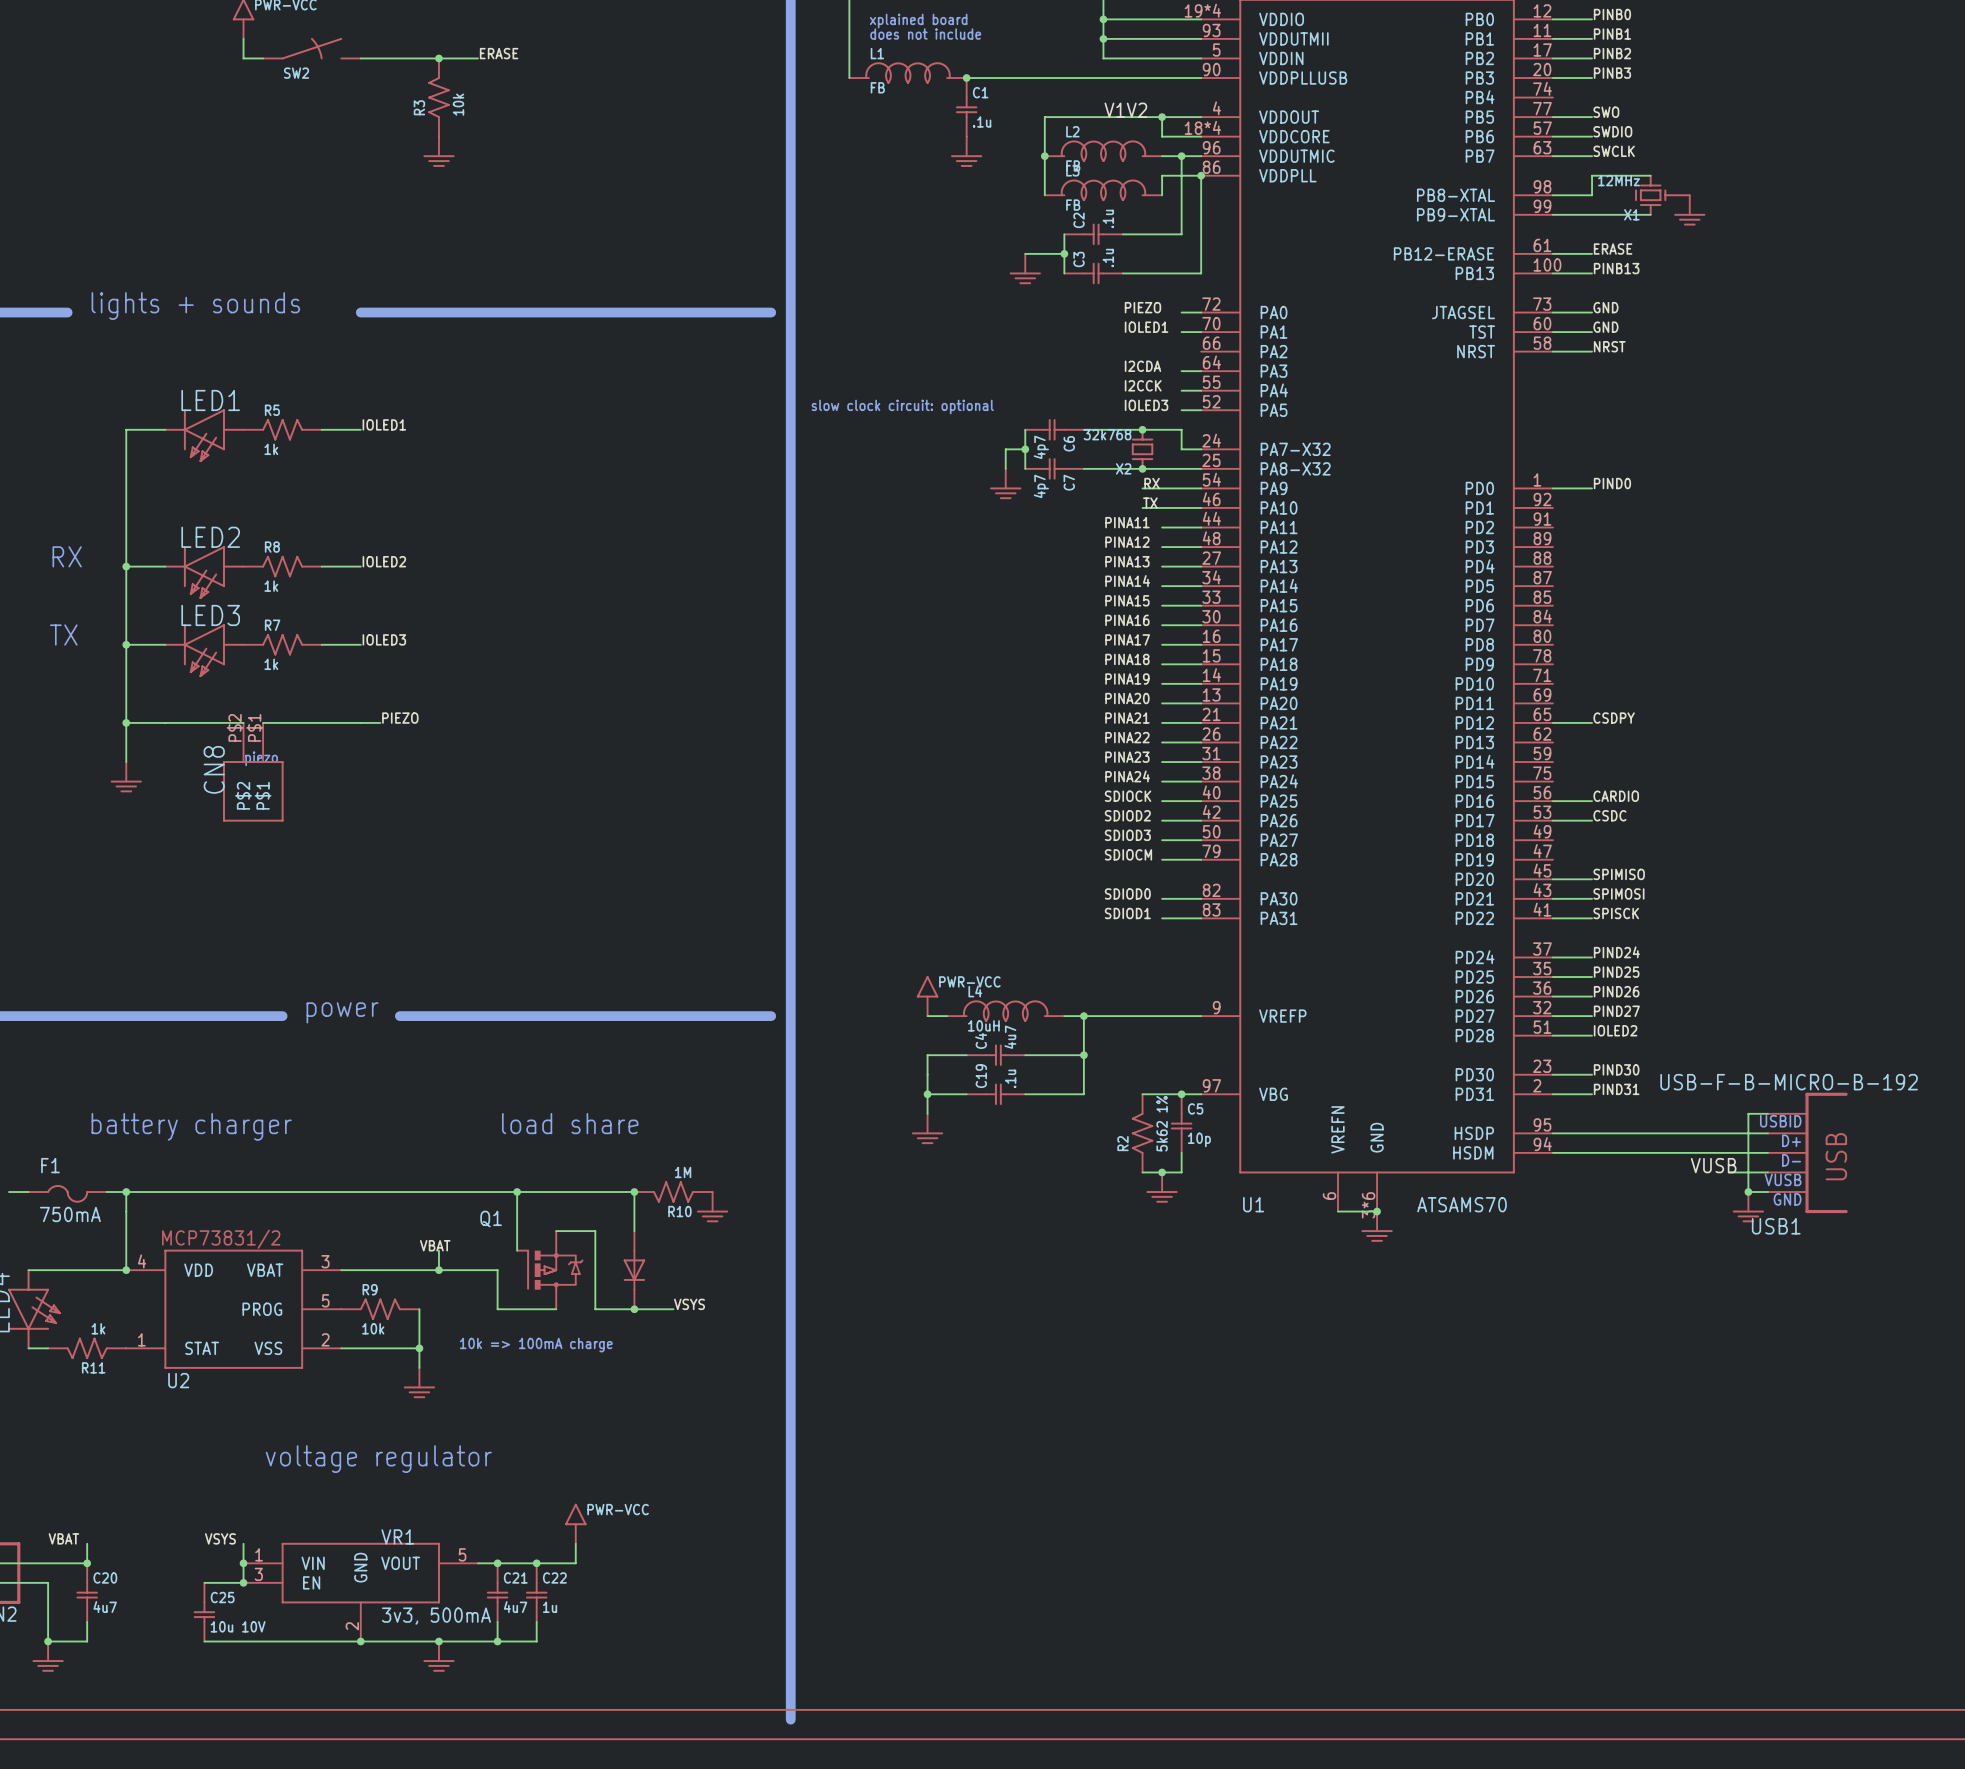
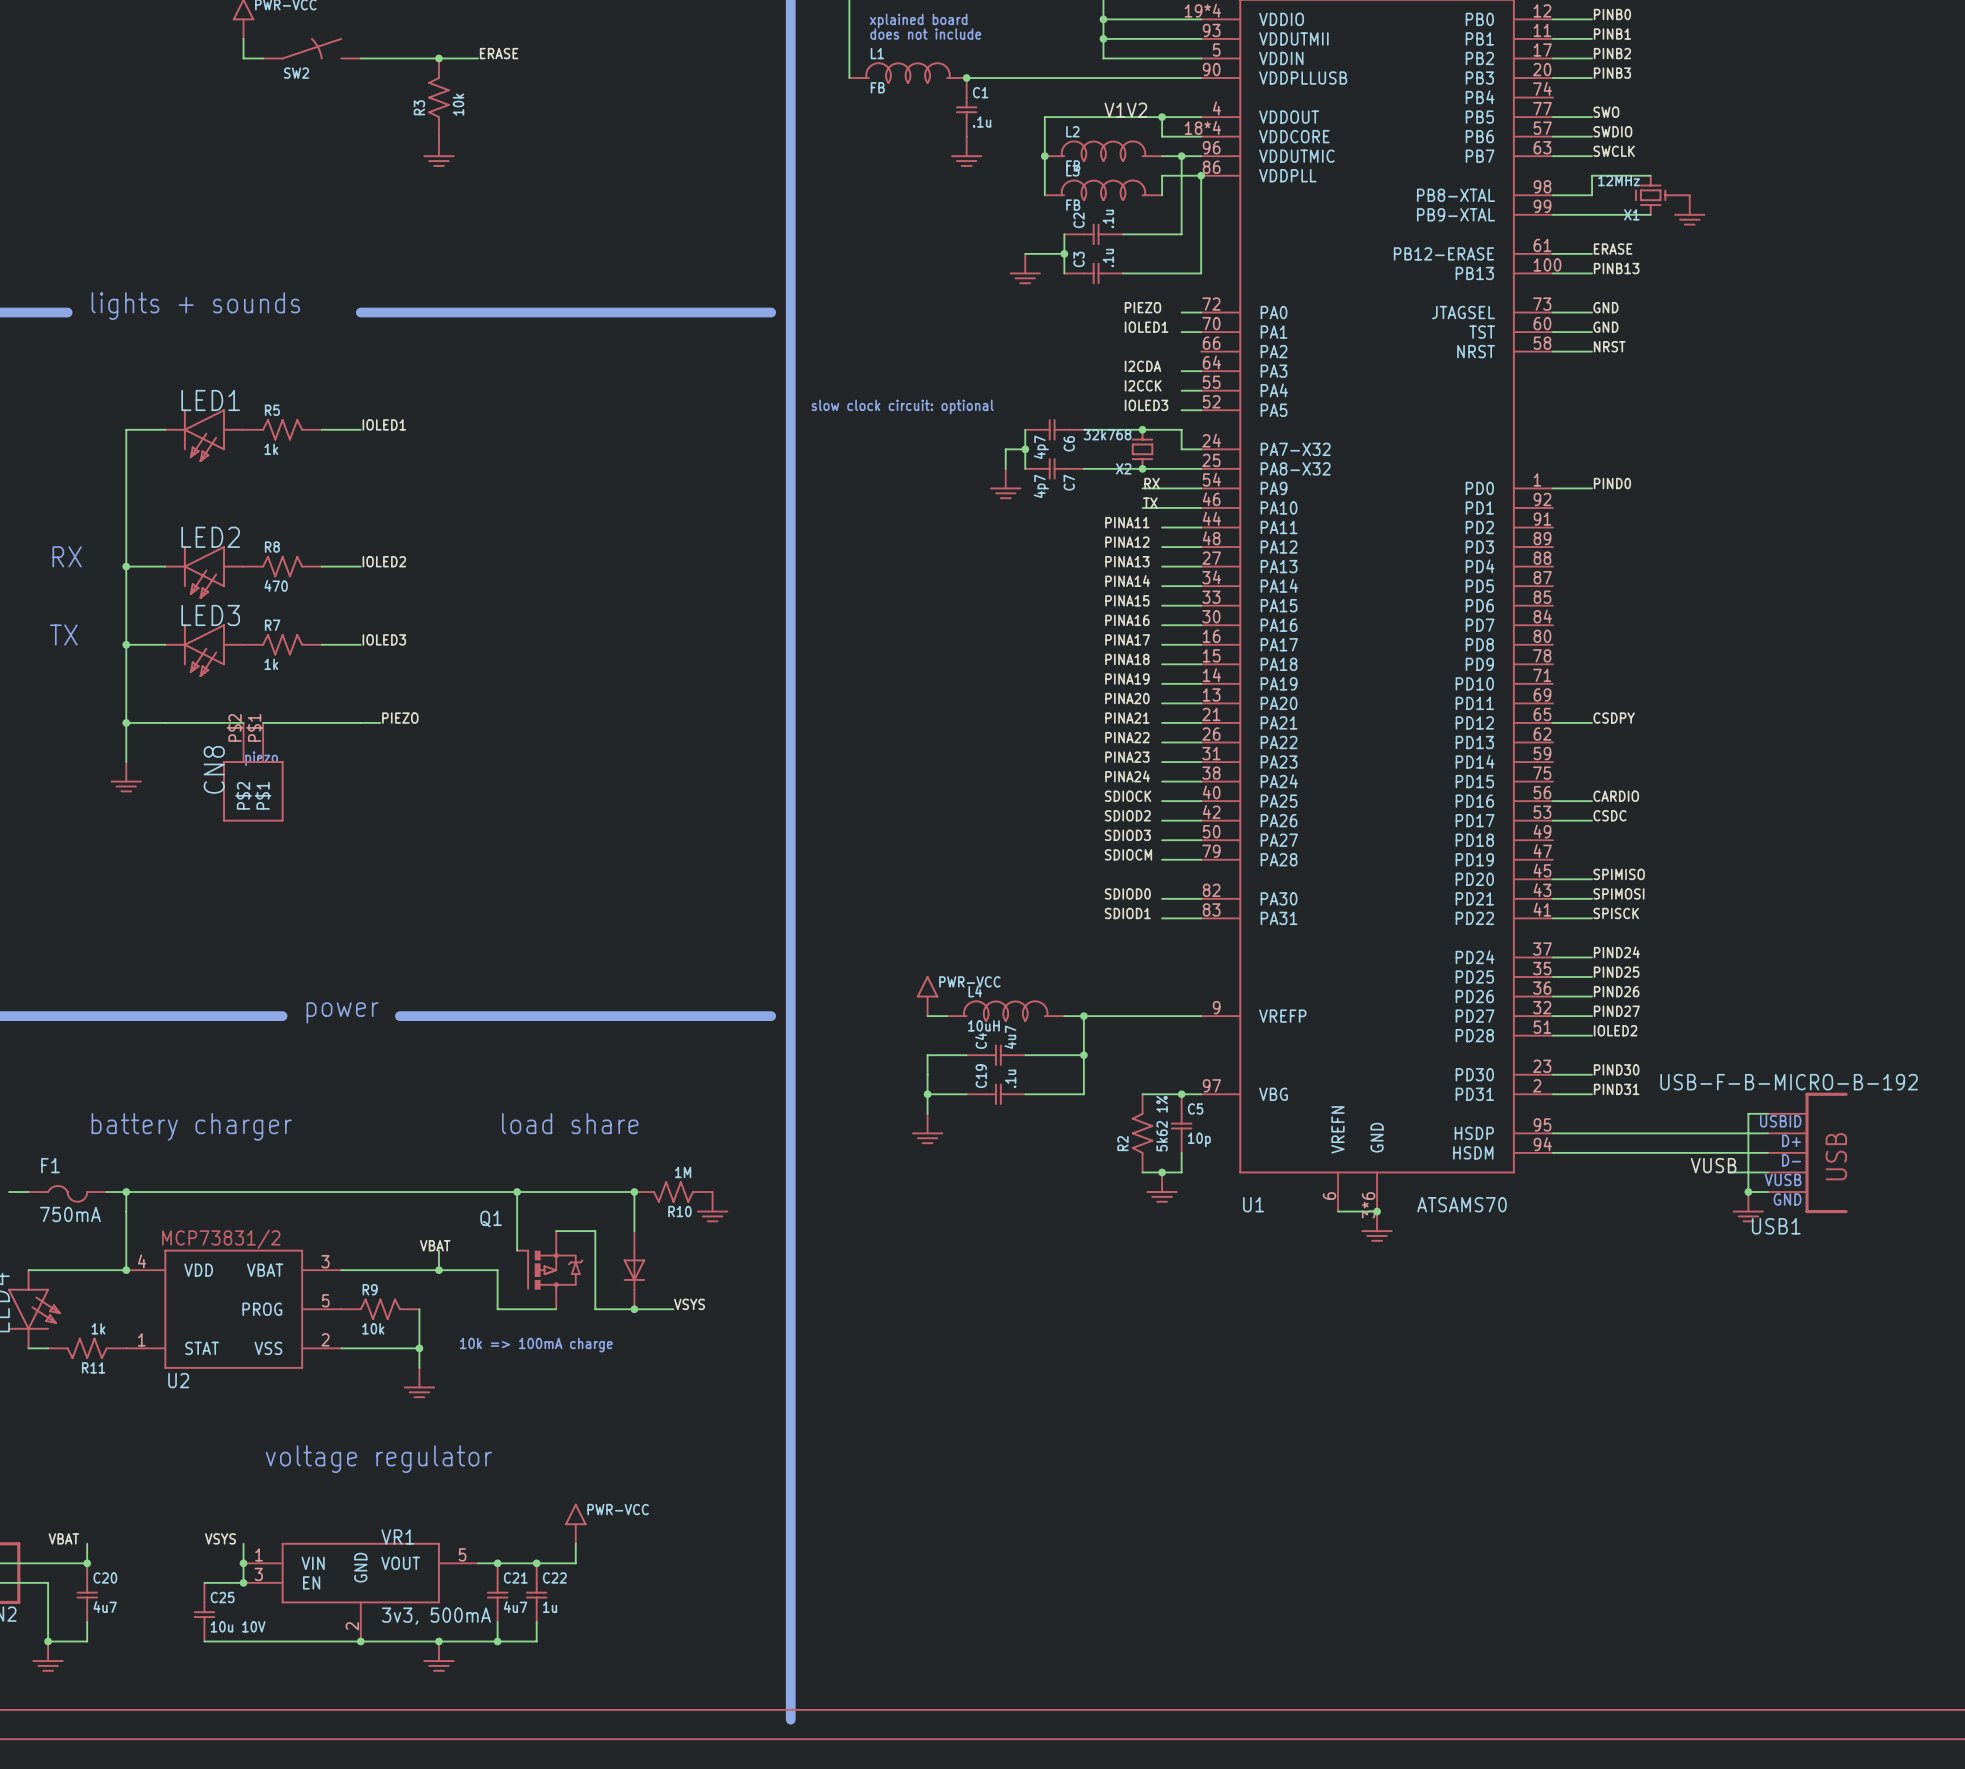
R8 value: 1k (271, 586) -> 470 (276, 585)

